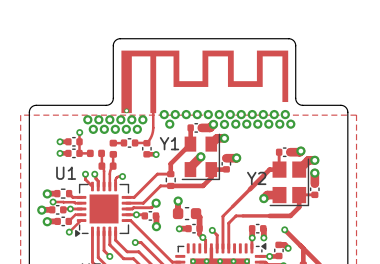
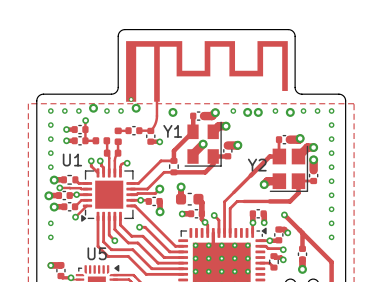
via: (164, 114) -> none
via: (175, 114) -> none
via: (186, 114) -> none
via: (197, 114) -> none
via: (208, 114) -> none
via: (219, 114) -> none
via: (230, 114) -> none
via: (241, 114) -> none
via: (252, 114) -> none
via: (263, 114) -> none
via: (274, 114) -> none
via: (285, 114) -> none
via: (98, 119) -> none
via: (109, 119) -> none
via: (120, 119) -> none
via: (142, 119) -> none
via: none -> (50, 111)
via: none -> (64, 111)
via: none -> (78, 111)
via: none -> (106, 111)
via: none -> (121, 111)
via: none -> (233, 111)
via: none -> (275, 111)
via: none -> (303, 111)
via: none -> (317, 111)
via: none -> (331, 111)
via: (224, 124) -> none
via: (235, 124) -> none
via: (268, 124) -> none
via: (279, 124) -> none
via: (93, 129) -> none
via: (104, 129) -> none
via: (115, 129) -> none
via: (126, 129) -> none
via: (137, 129) -> none
via: none -> (50, 125)
via: none -> (331, 125)
via: none -> (50, 139)
via: none -> (331, 139)
via: none -> (50, 153)
via: none -> (331, 153)
via: none -> (50, 167)
via: none -> (331, 167)
via: none -> (331, 181)
via: none -> (331, 195)
via: none -> (331, 209)
via: none -> (50, 223)
via: none -> (331, 223)
via: none -> (50, 237)
via: none -> (331, 237)

